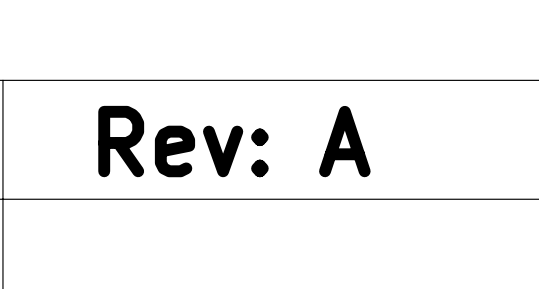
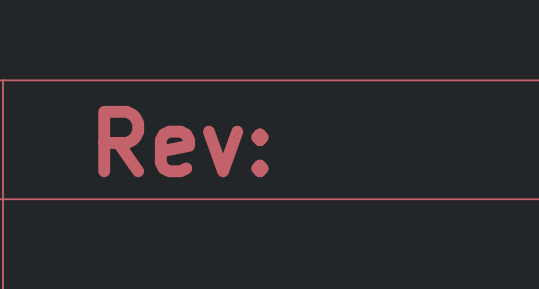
title block: Rev: A (234, 141) -> Rev: (183, 141)

